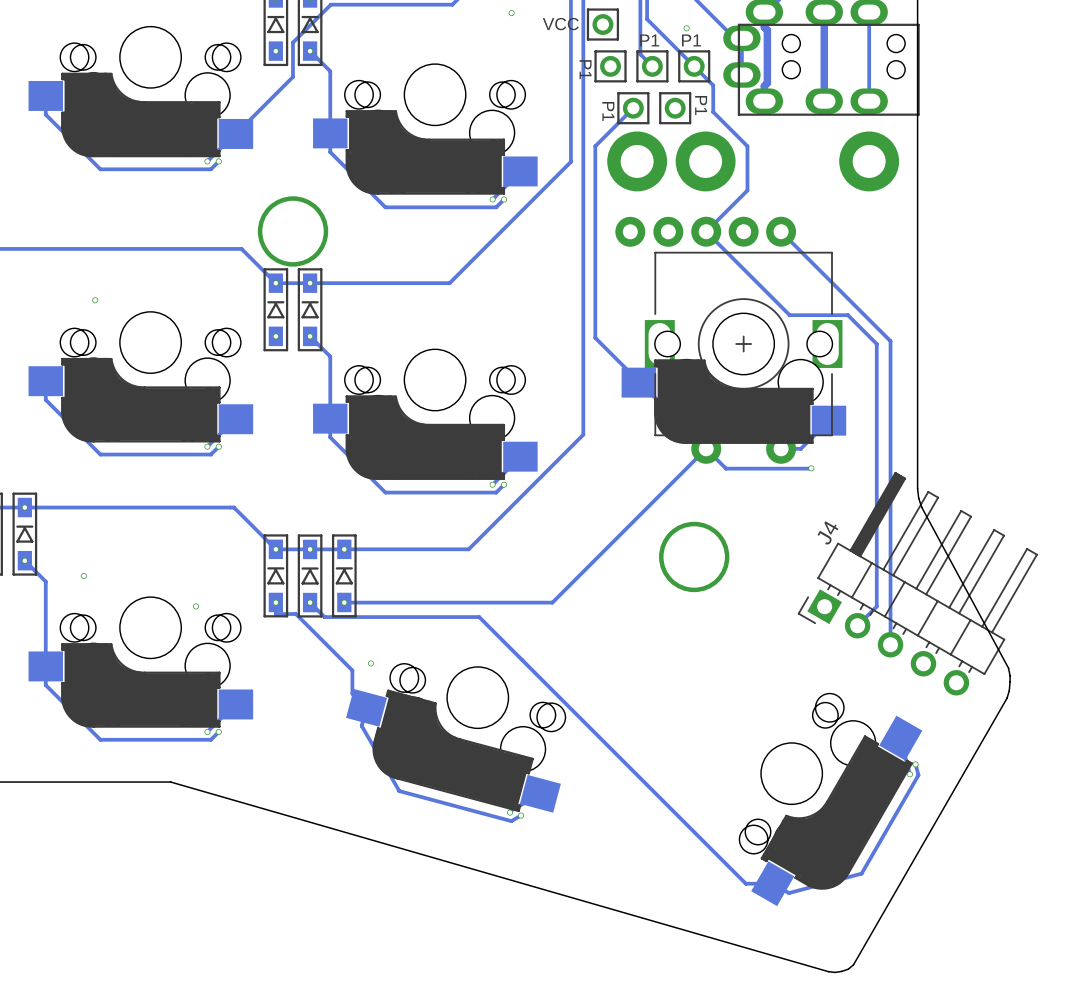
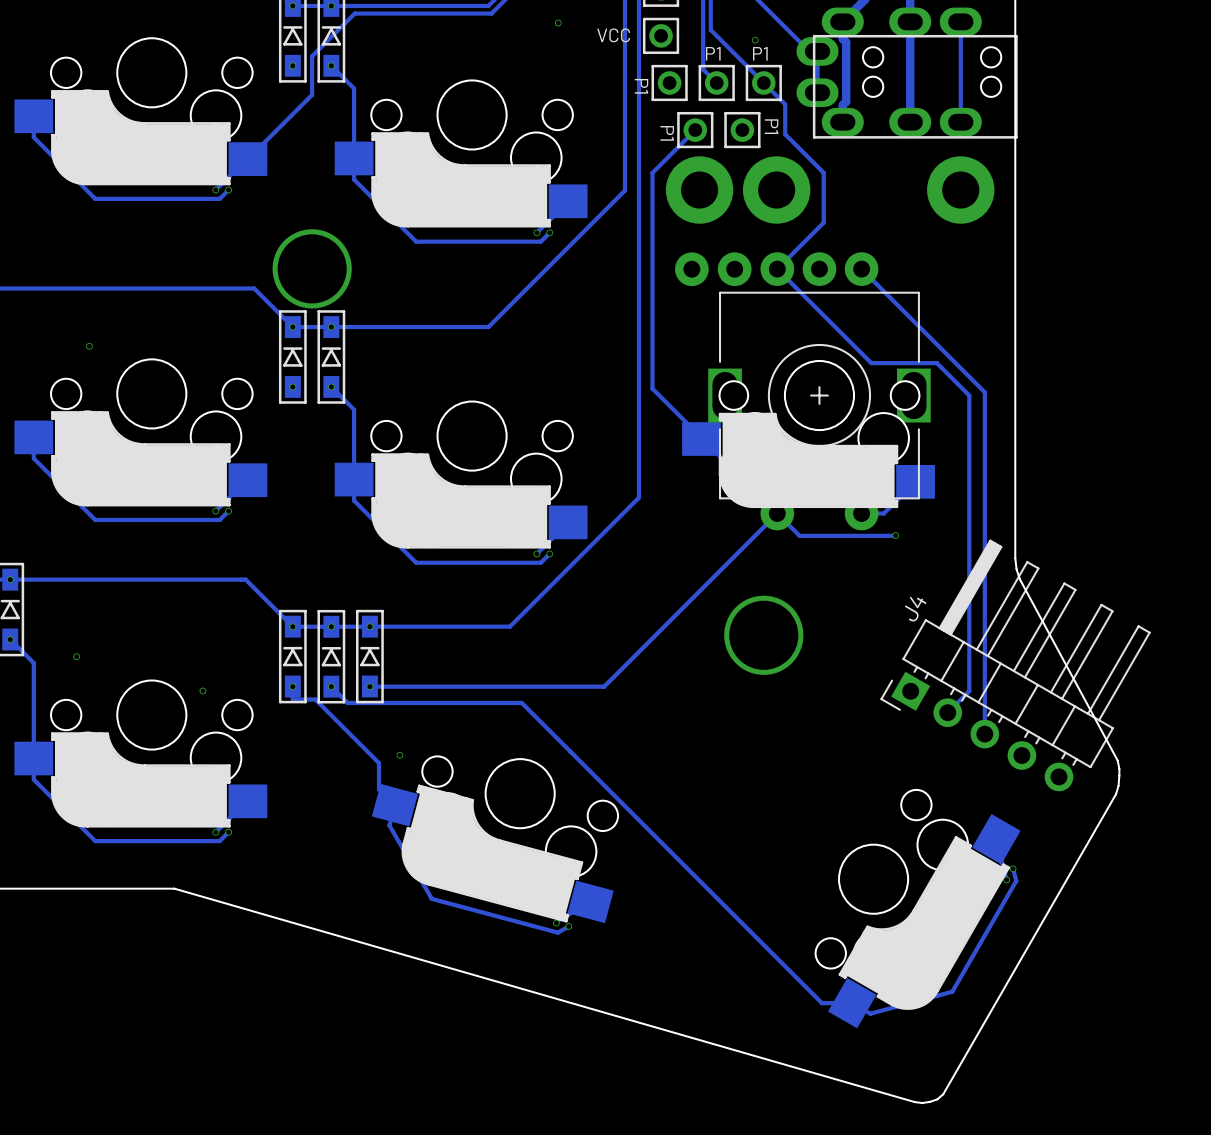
part footprint: [28, 26, 254, 158] -> [14, 38, 268, 186]
part footprint: [313, 64, 538, 195] -> [334, 80, 588, 228]
part footprint: [28, 311, 254, 443] -> [14, 359, 268, 507]
part footprint: [313, 349, 538, 480] -> [334, 401, 588, 549]
part footprint: [28, 597, 254, 728] -> [14, 680, 268, 828]
part footprint: [346, 663, 566, 813] -> [371, 756, 619, 924]
part footprint: [739, 693, 923, 907] -> [815, 789, 1021, 1029]

